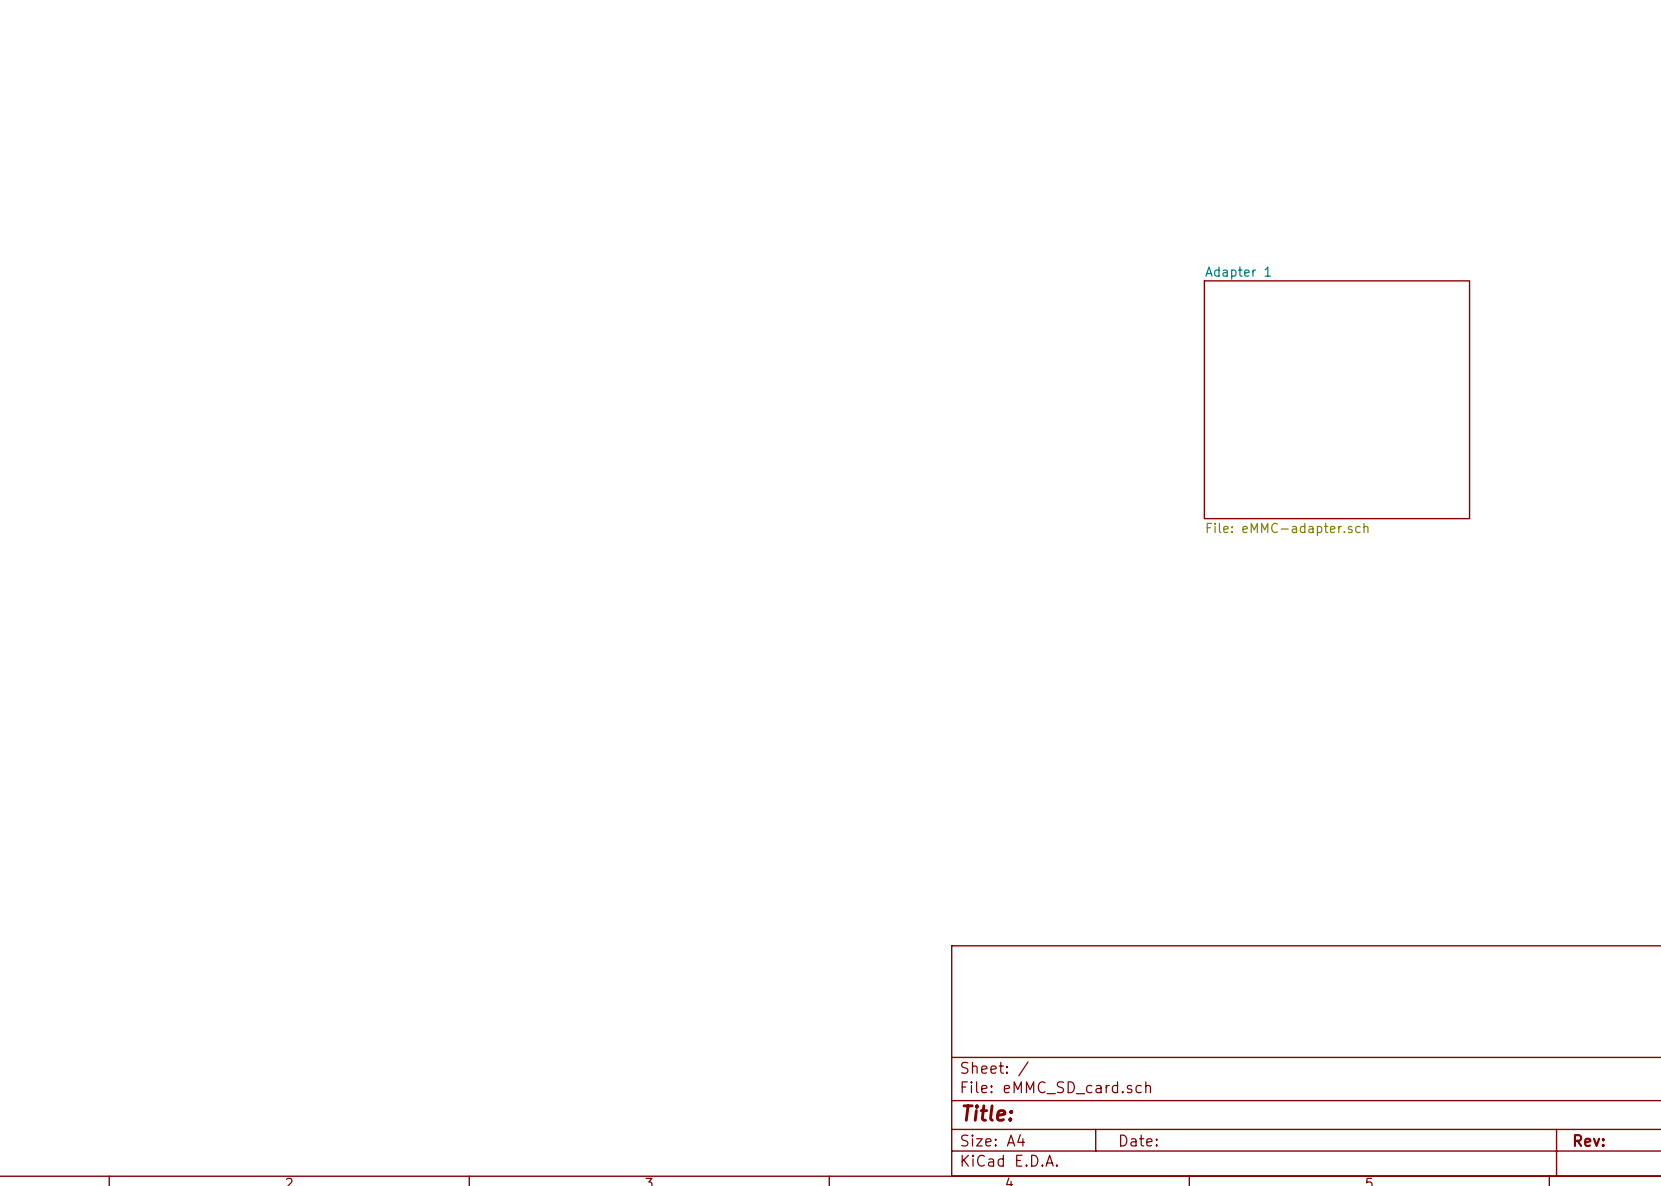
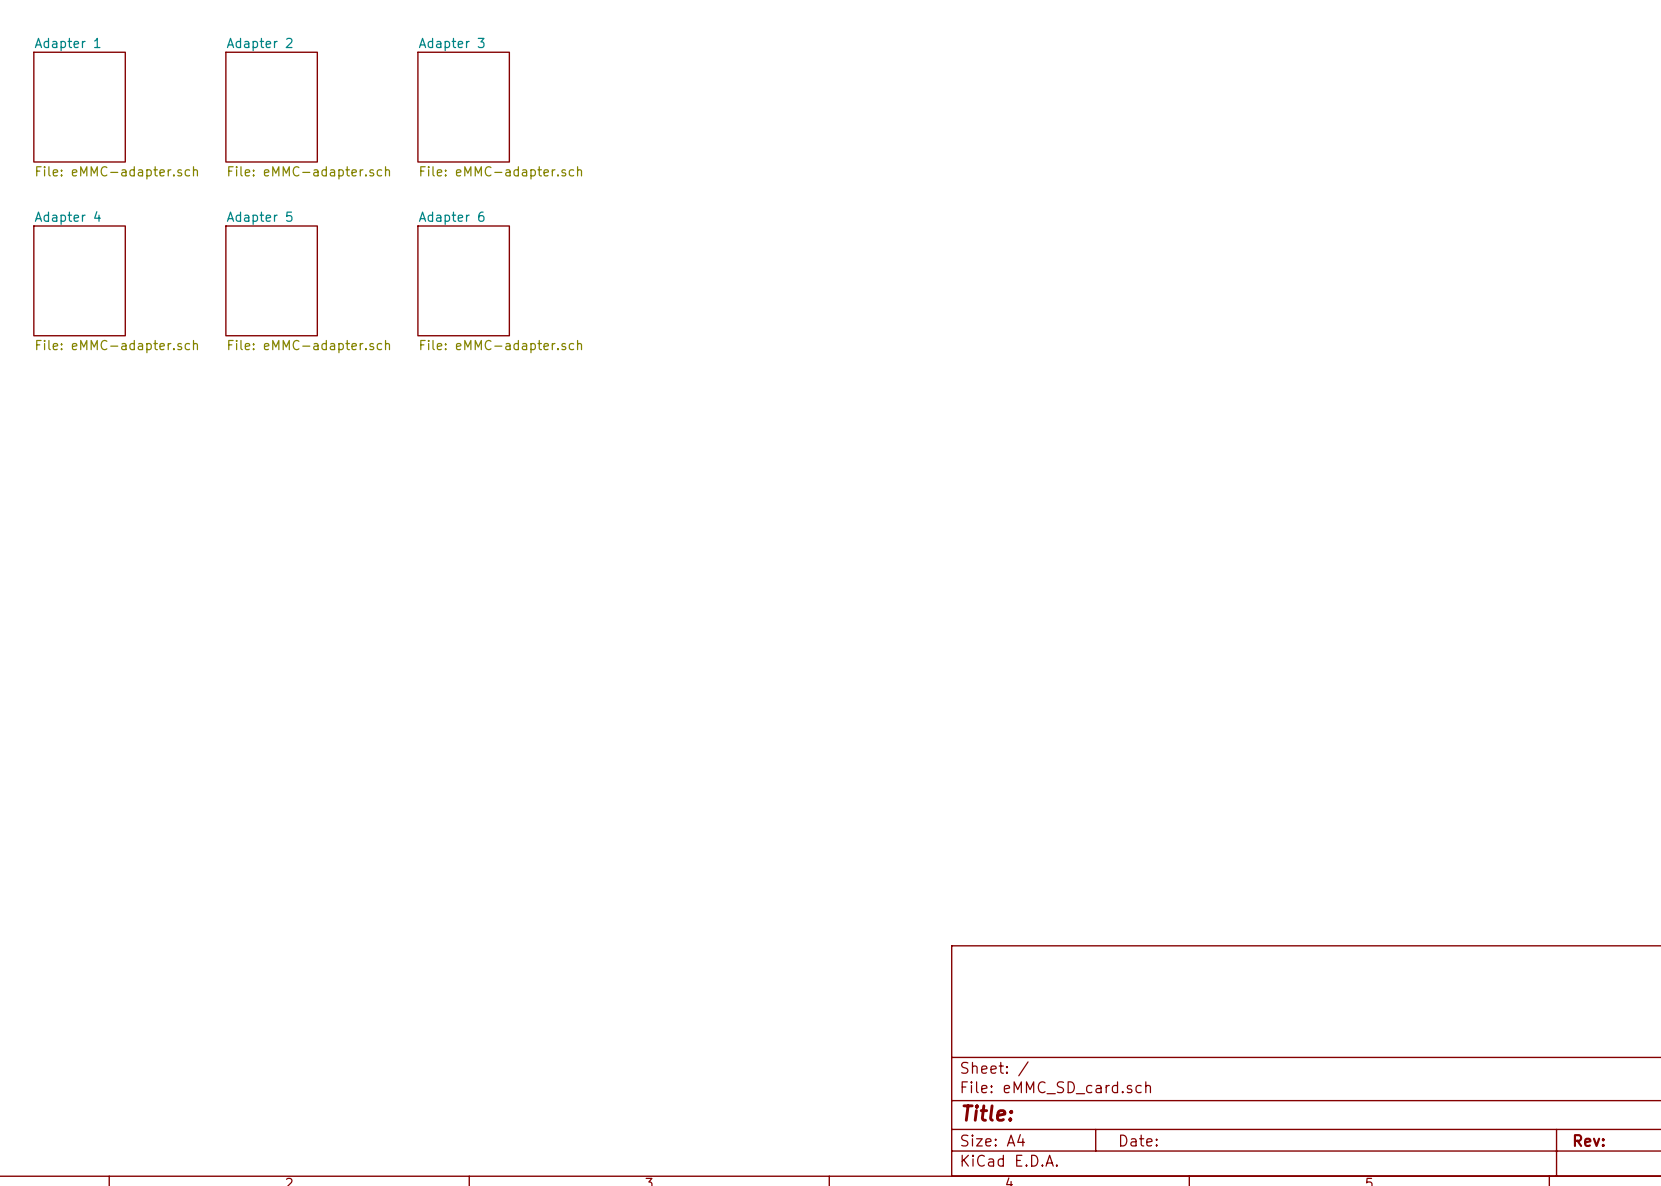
sheet Adapter 2: none -> File: eMMC-adapter.sch (271, 107)
sheet Adapter 3: none -> File: eMMC-adapter.sch (463, 107)
sheet Adapter 1 name position: Adapter 1 (1238, 273) -> Adapter 1 (67, 44)
sheet Adapter 4: none -> File: eMMC-adapter.sch (79, 280)
sheet Adapter 5: none -> File: eMMC-adapter.sch (271, 280)
sheet Adapter 6: none -> File: eMMC-adapter.sch (463, 280)
sheet Adapter 1 shape: [1204, 280, 1470, 519] -> [33, 52, 126, 162]
sheet Adapter 1 value position: File: eMMC-adapter.sch (1287, 529) -> File: eMMC-adapter.sch (117, 172)

